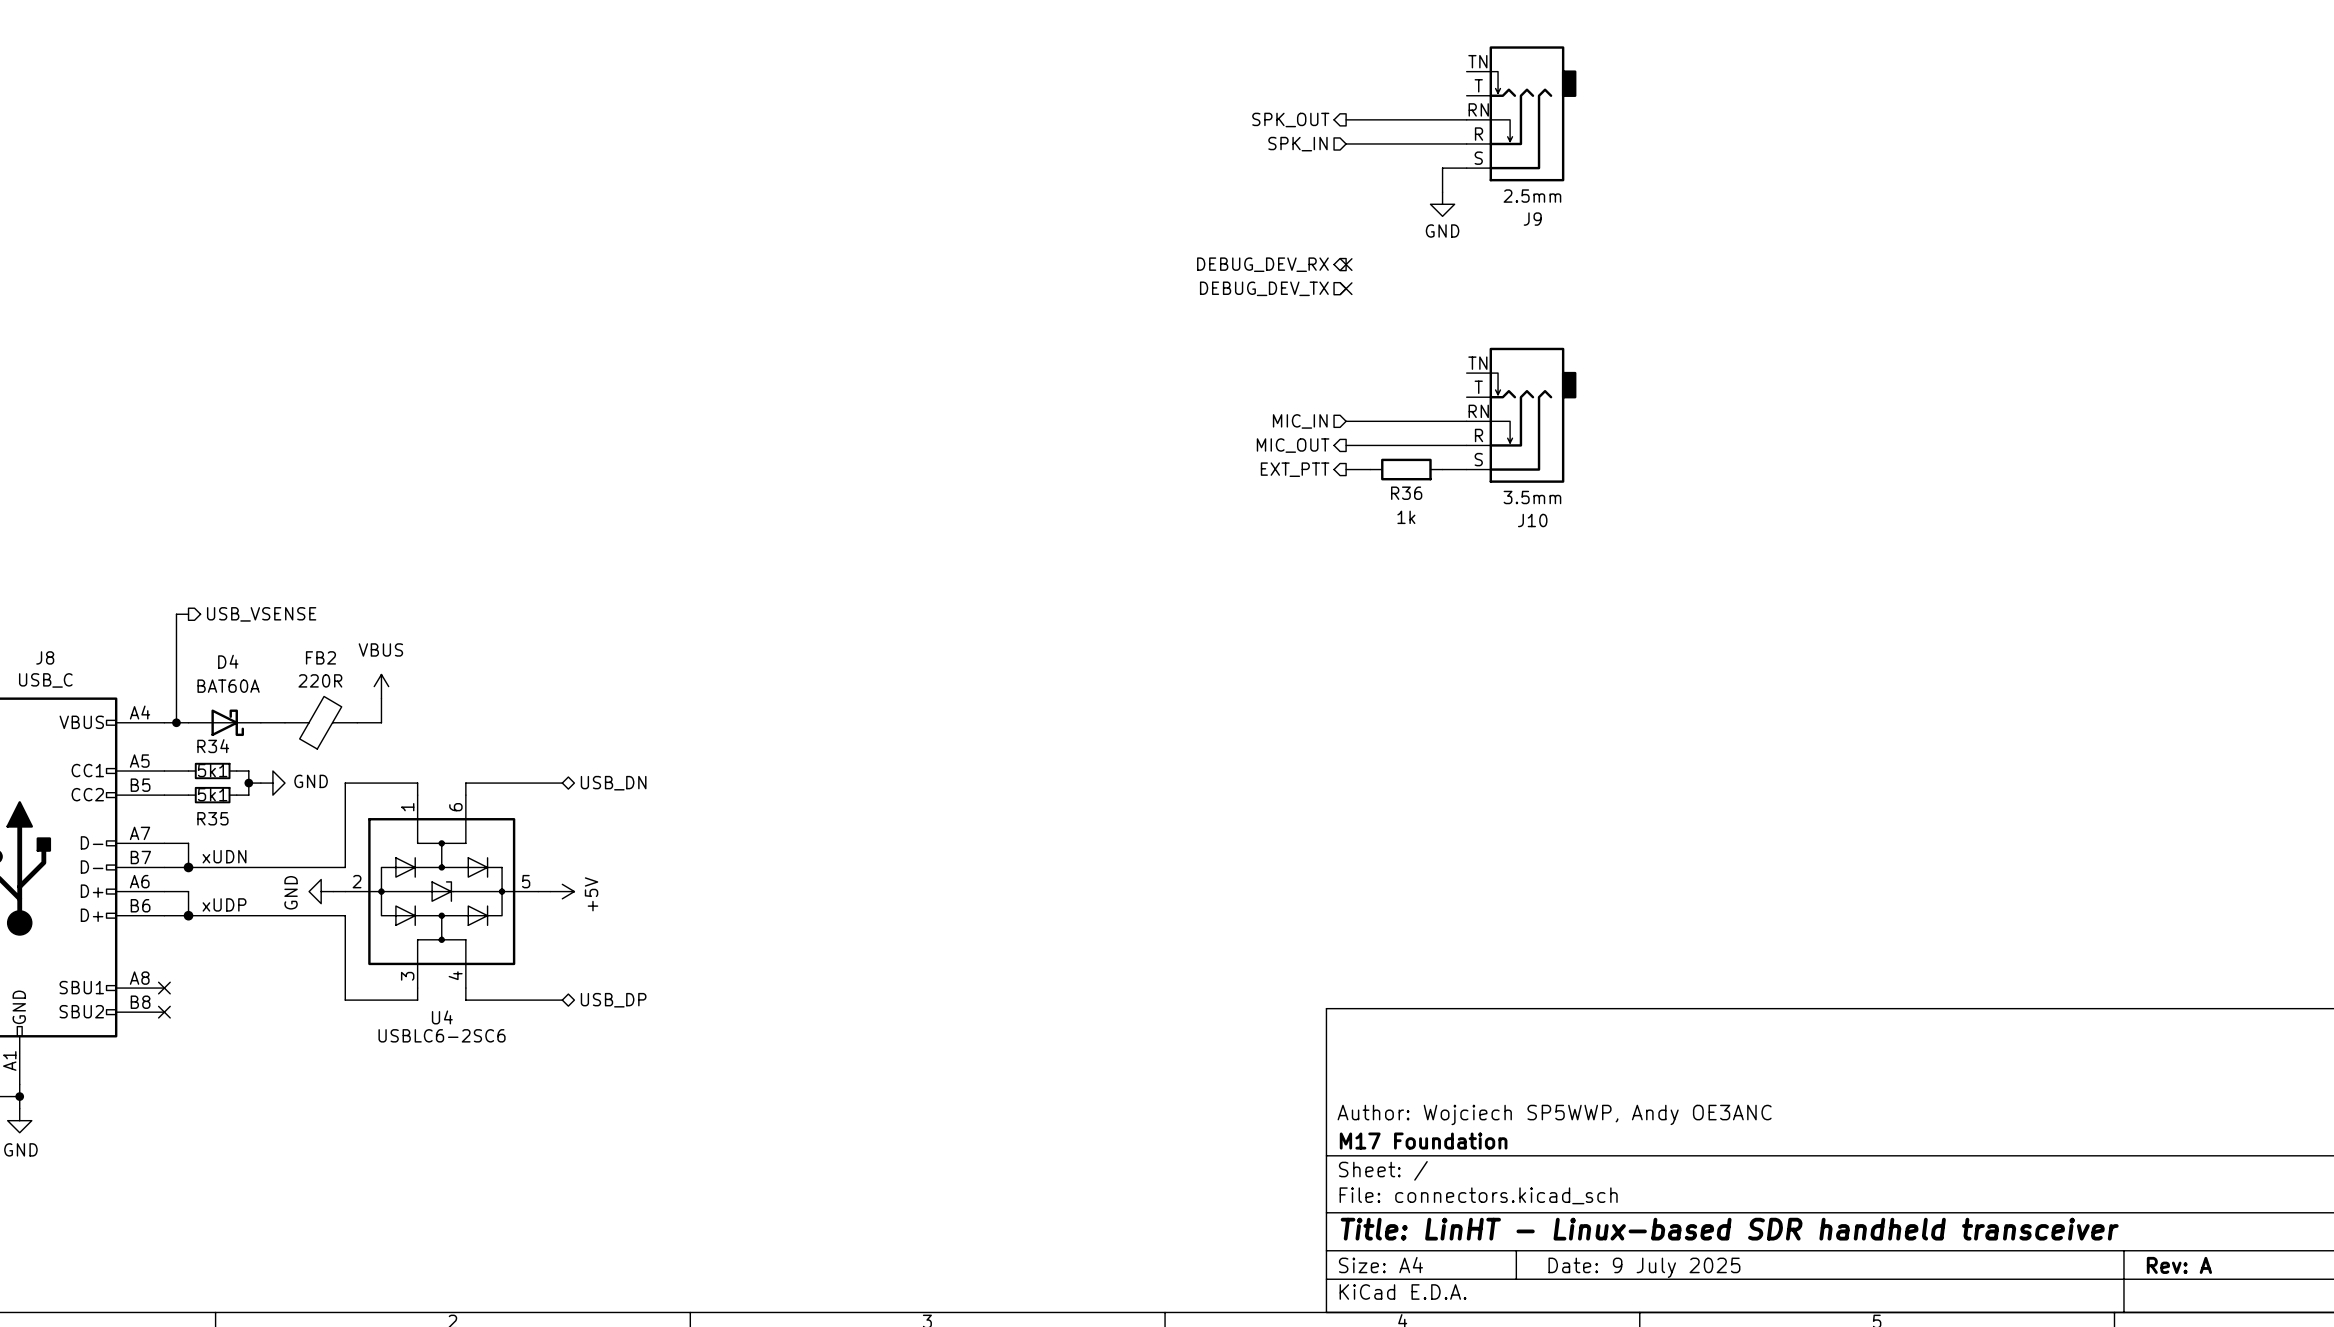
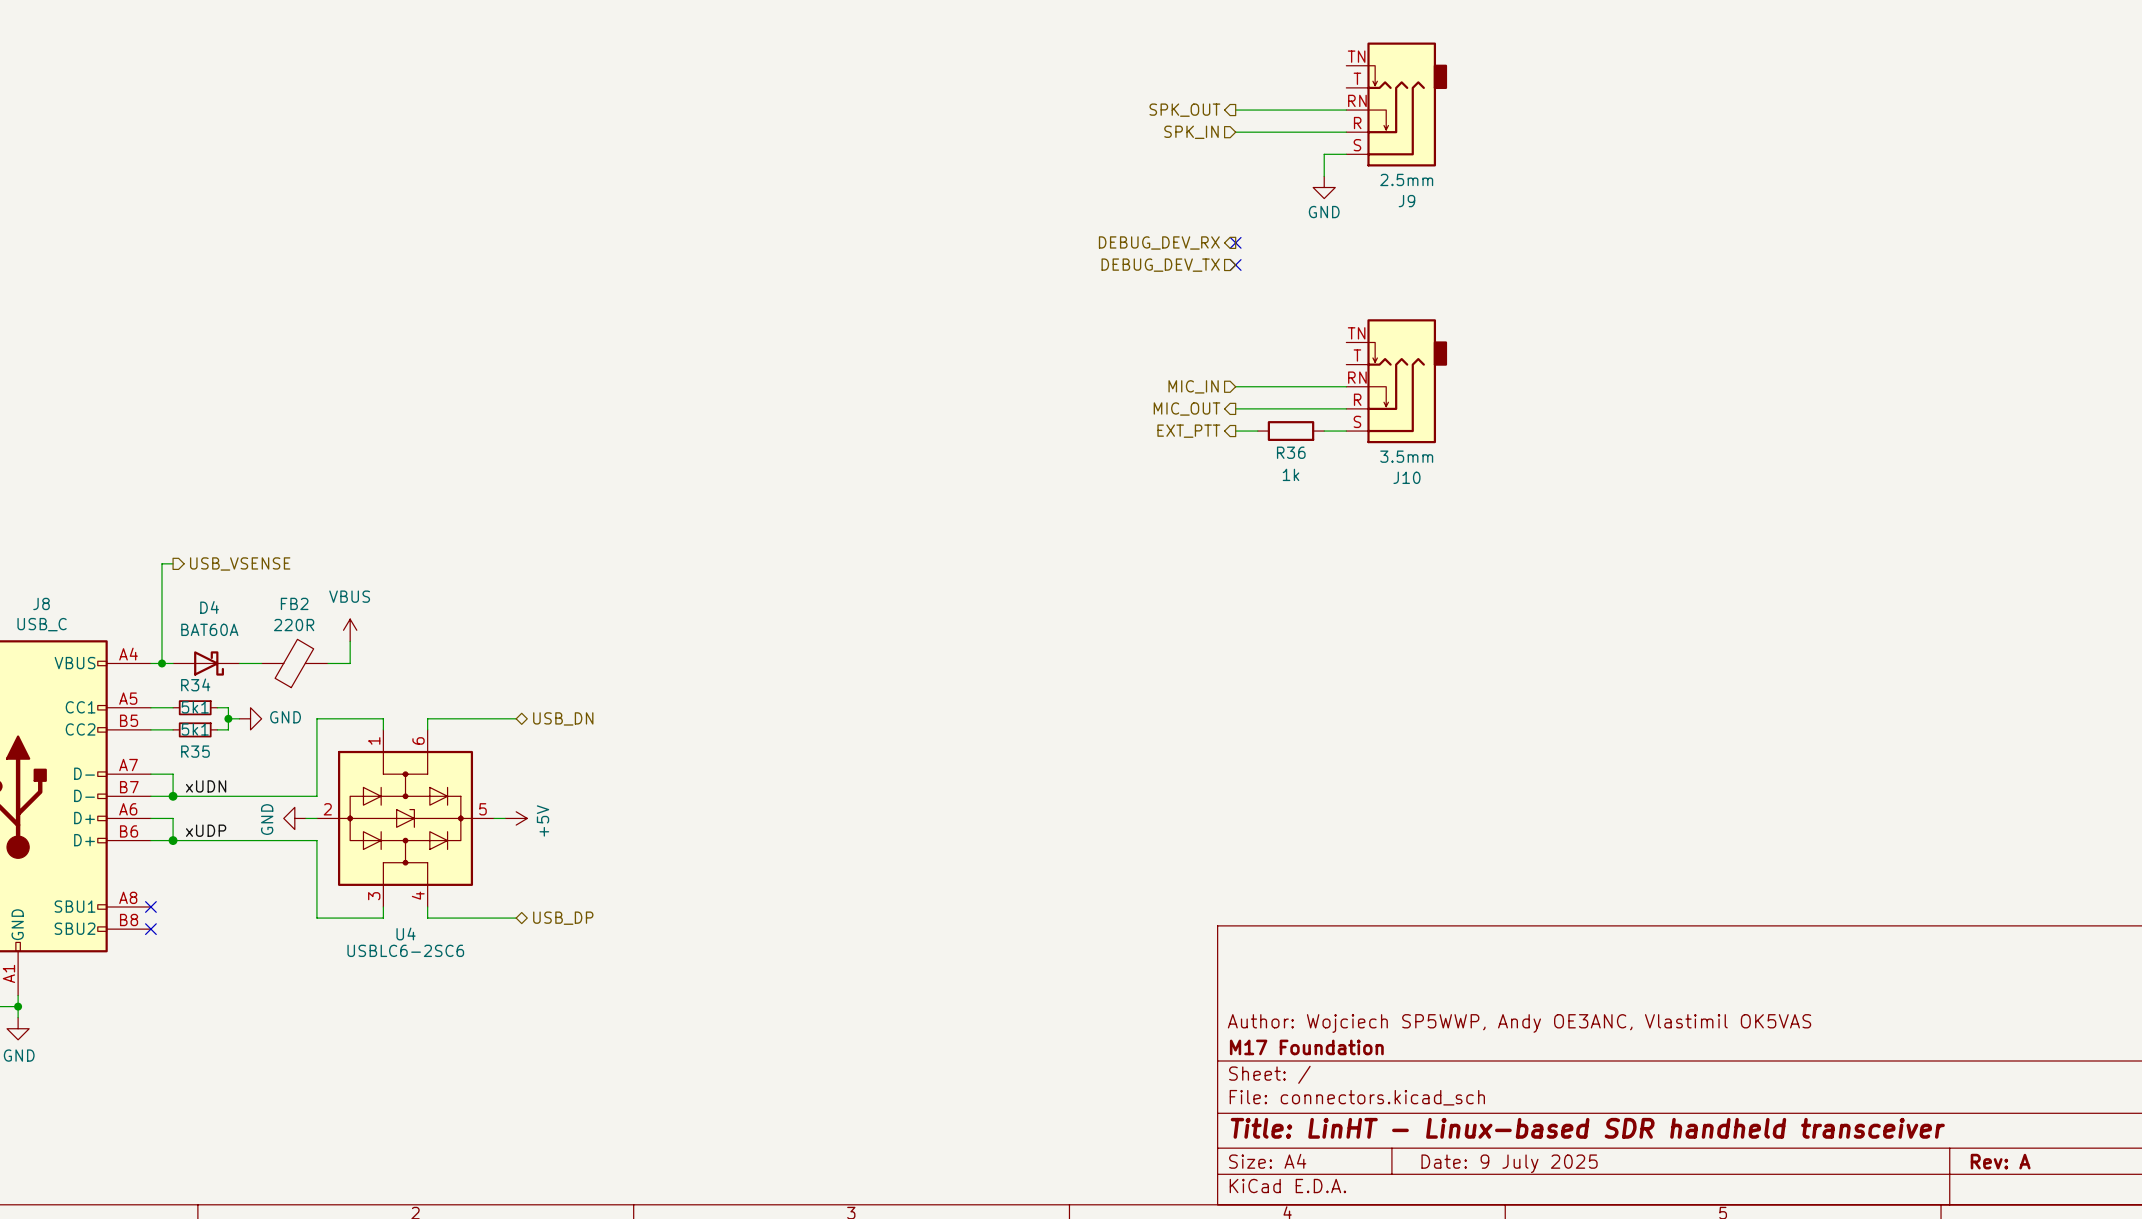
title block: Author: Wojciech SP5WWP, Andy OE3ANC (1554, 1114) -> Author: Wojciech SP5WWP, Andy OE3ANC, Vlastimil OK5VAS (1519, 1023)

